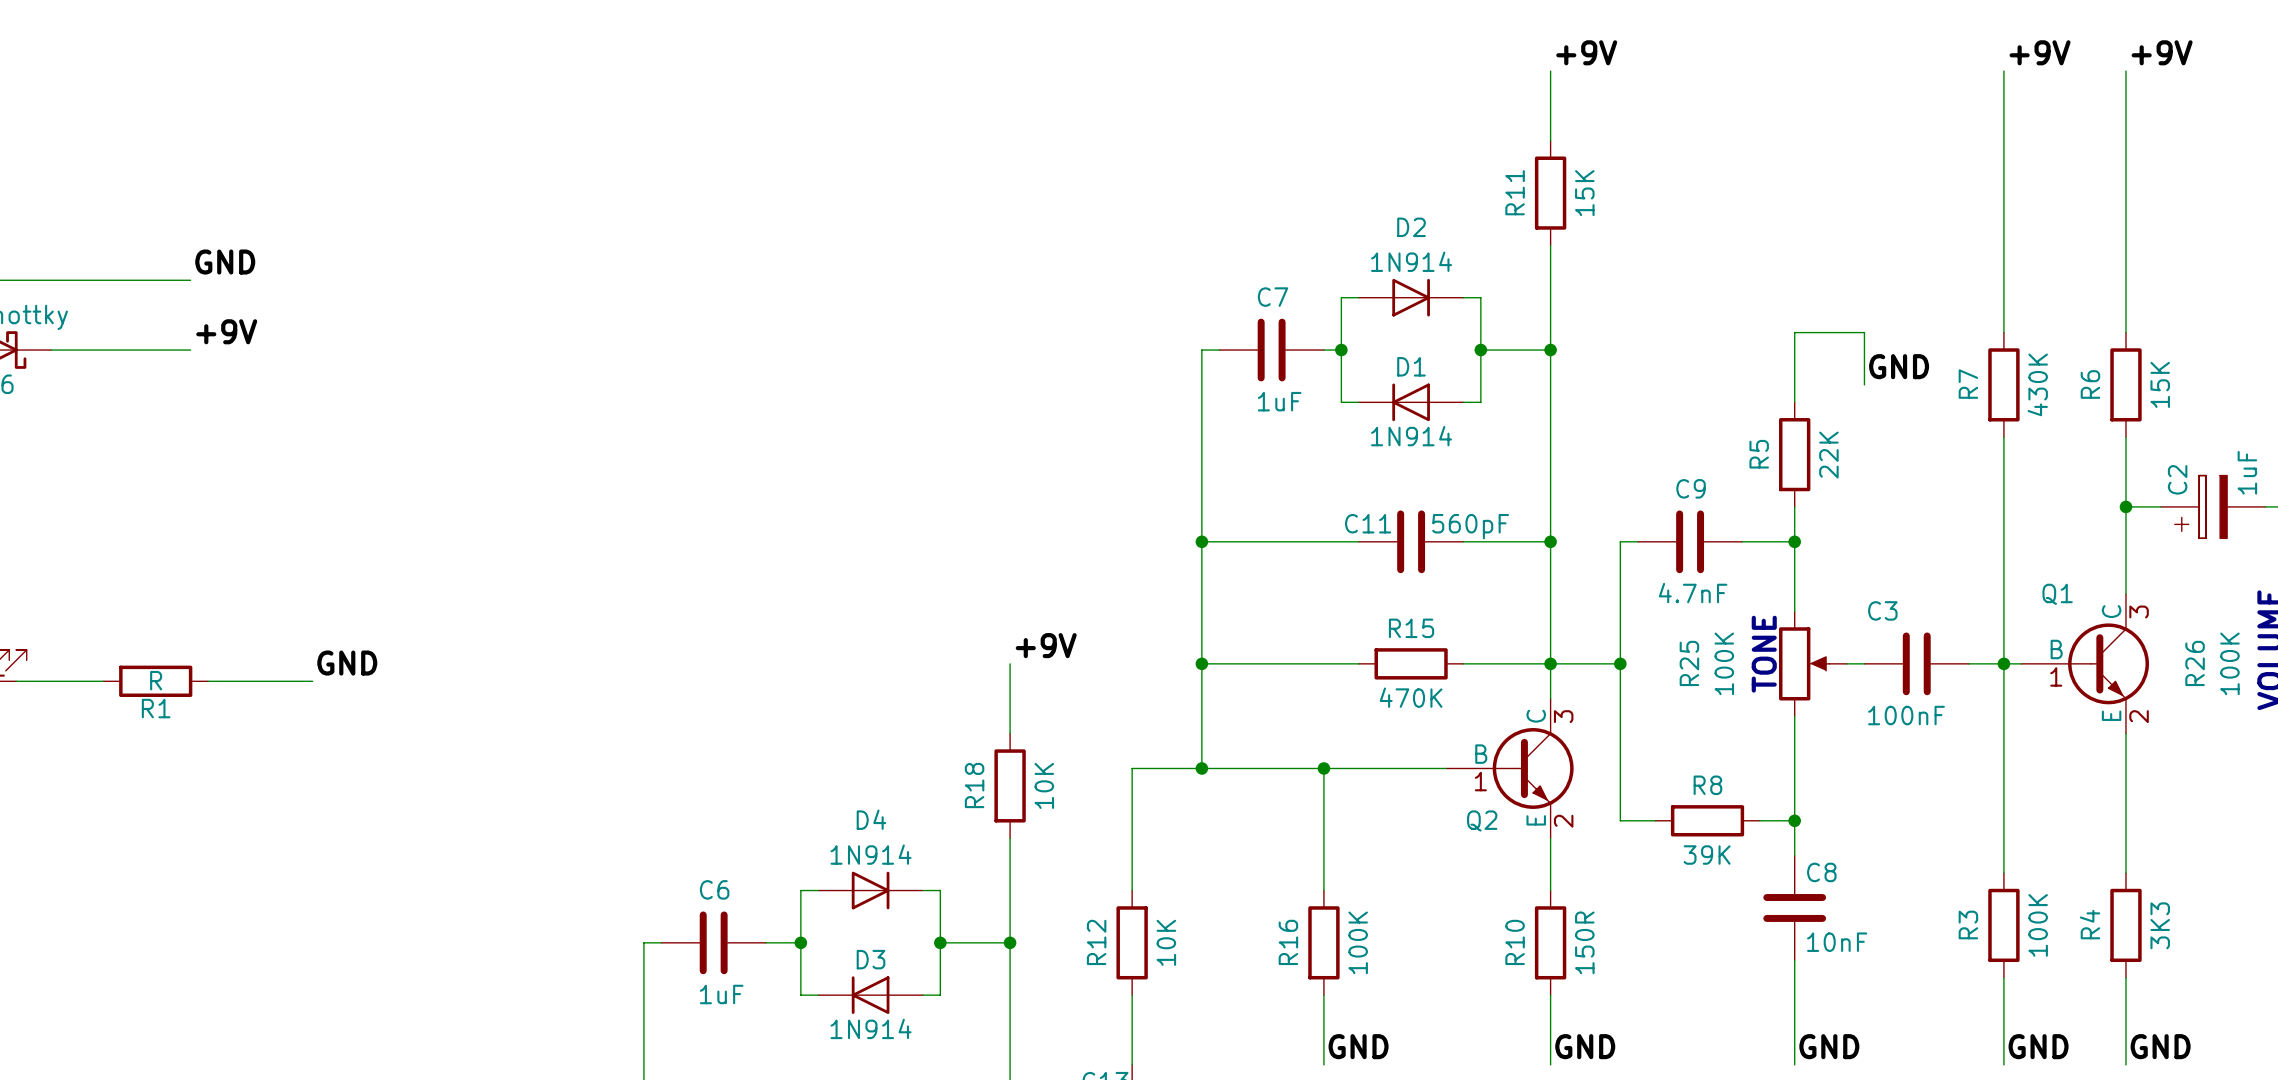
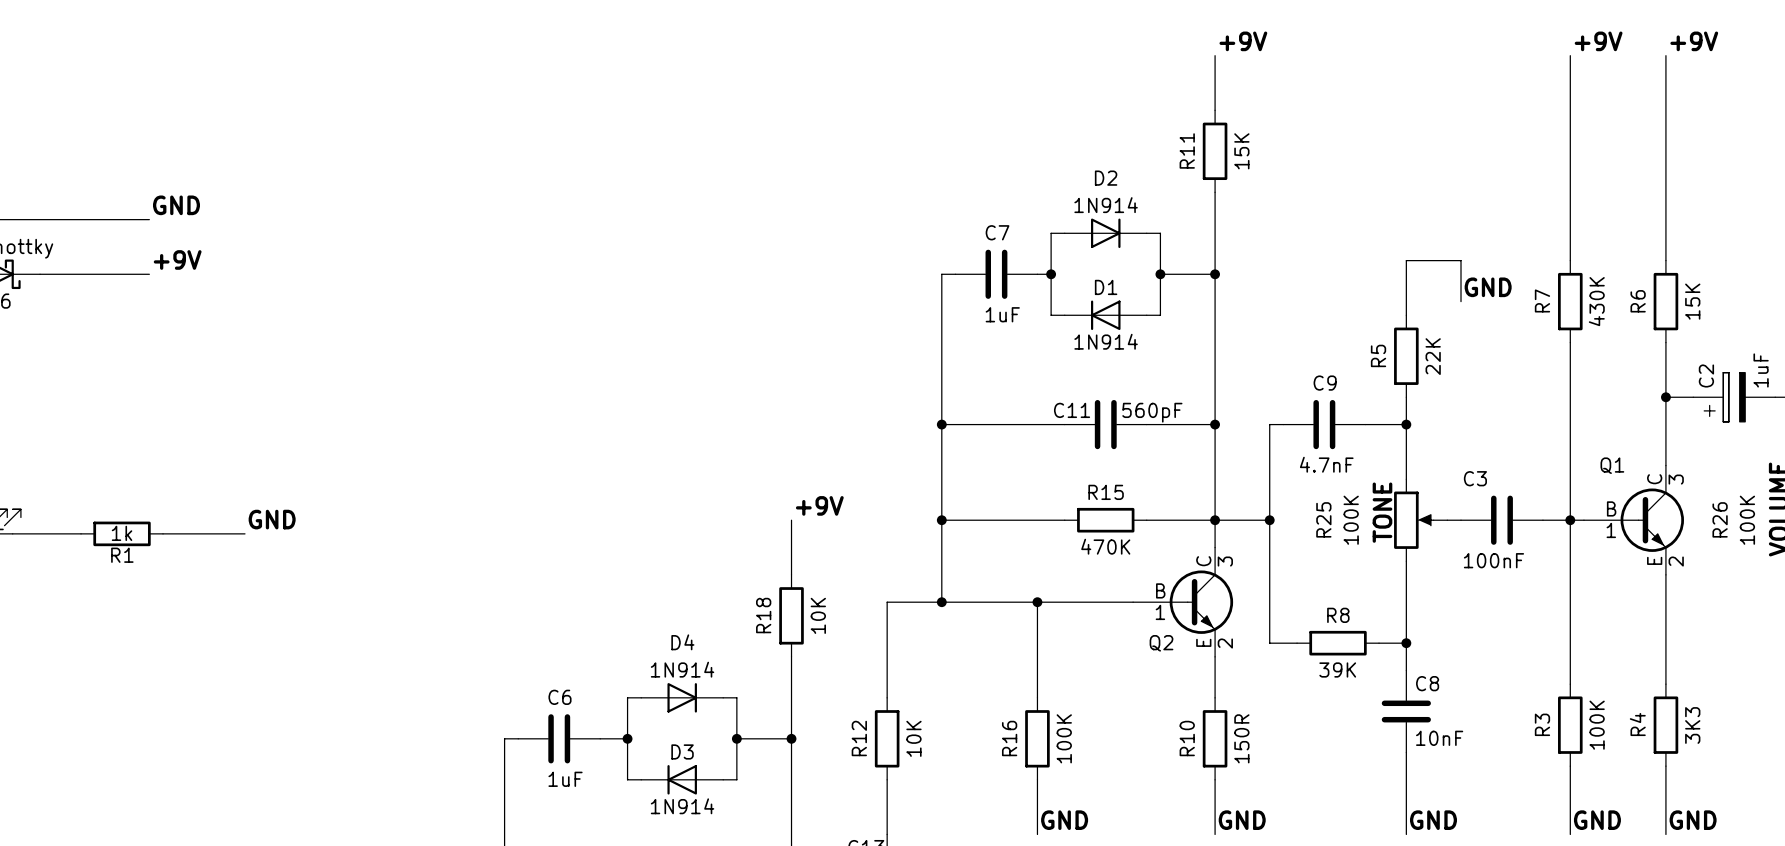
R1 value: R (156, 680) -> 1k (122, 533)

